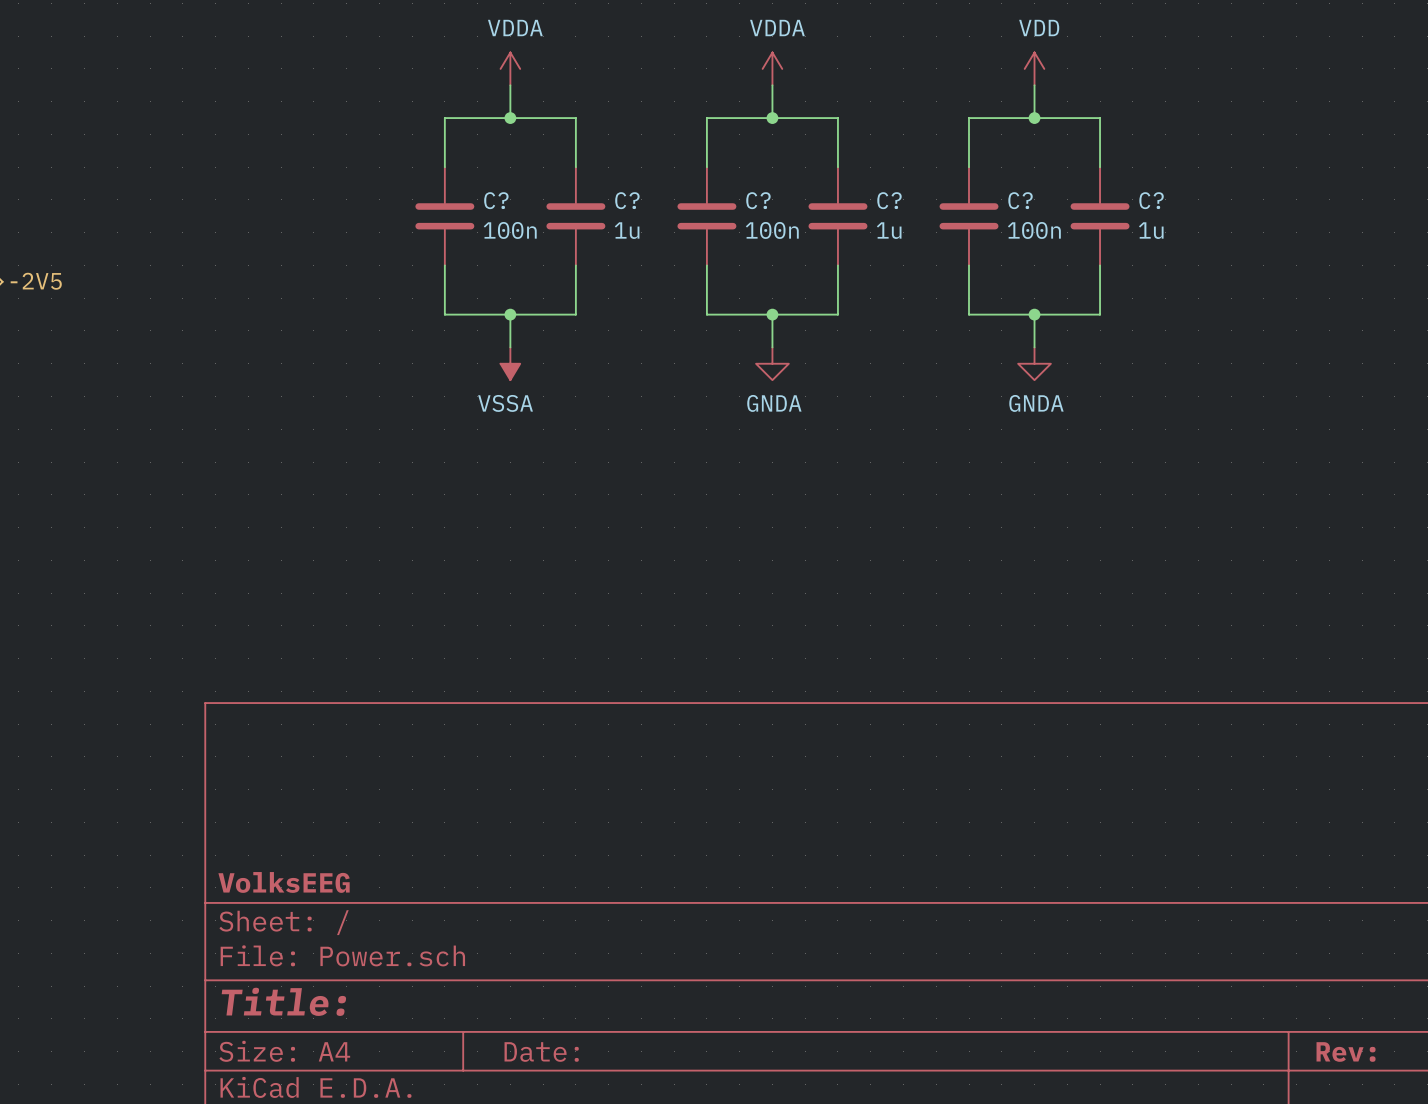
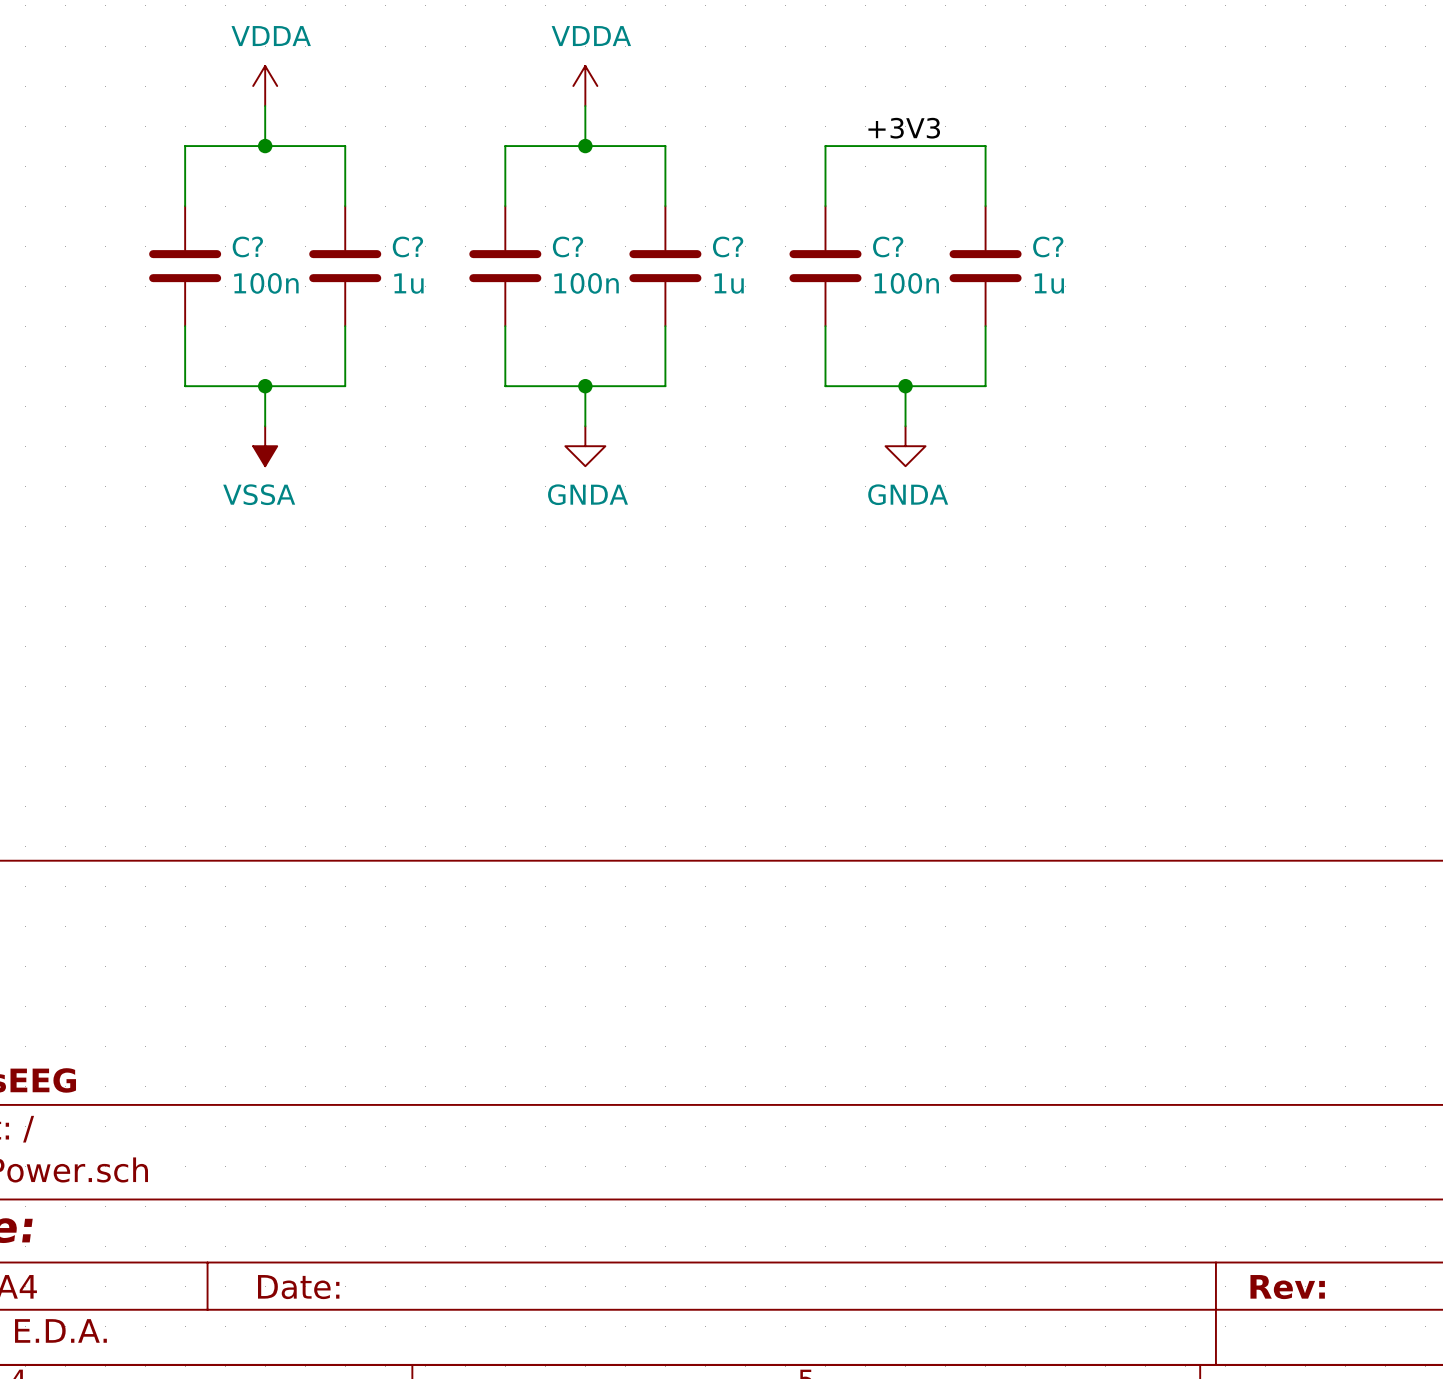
power symbol: VDD (1034, 68) -> none
wire: (1034, 85) (1034, 118) -> none
label: none -> +3V3 (904, 128)
junction: (1034, 118) -> none

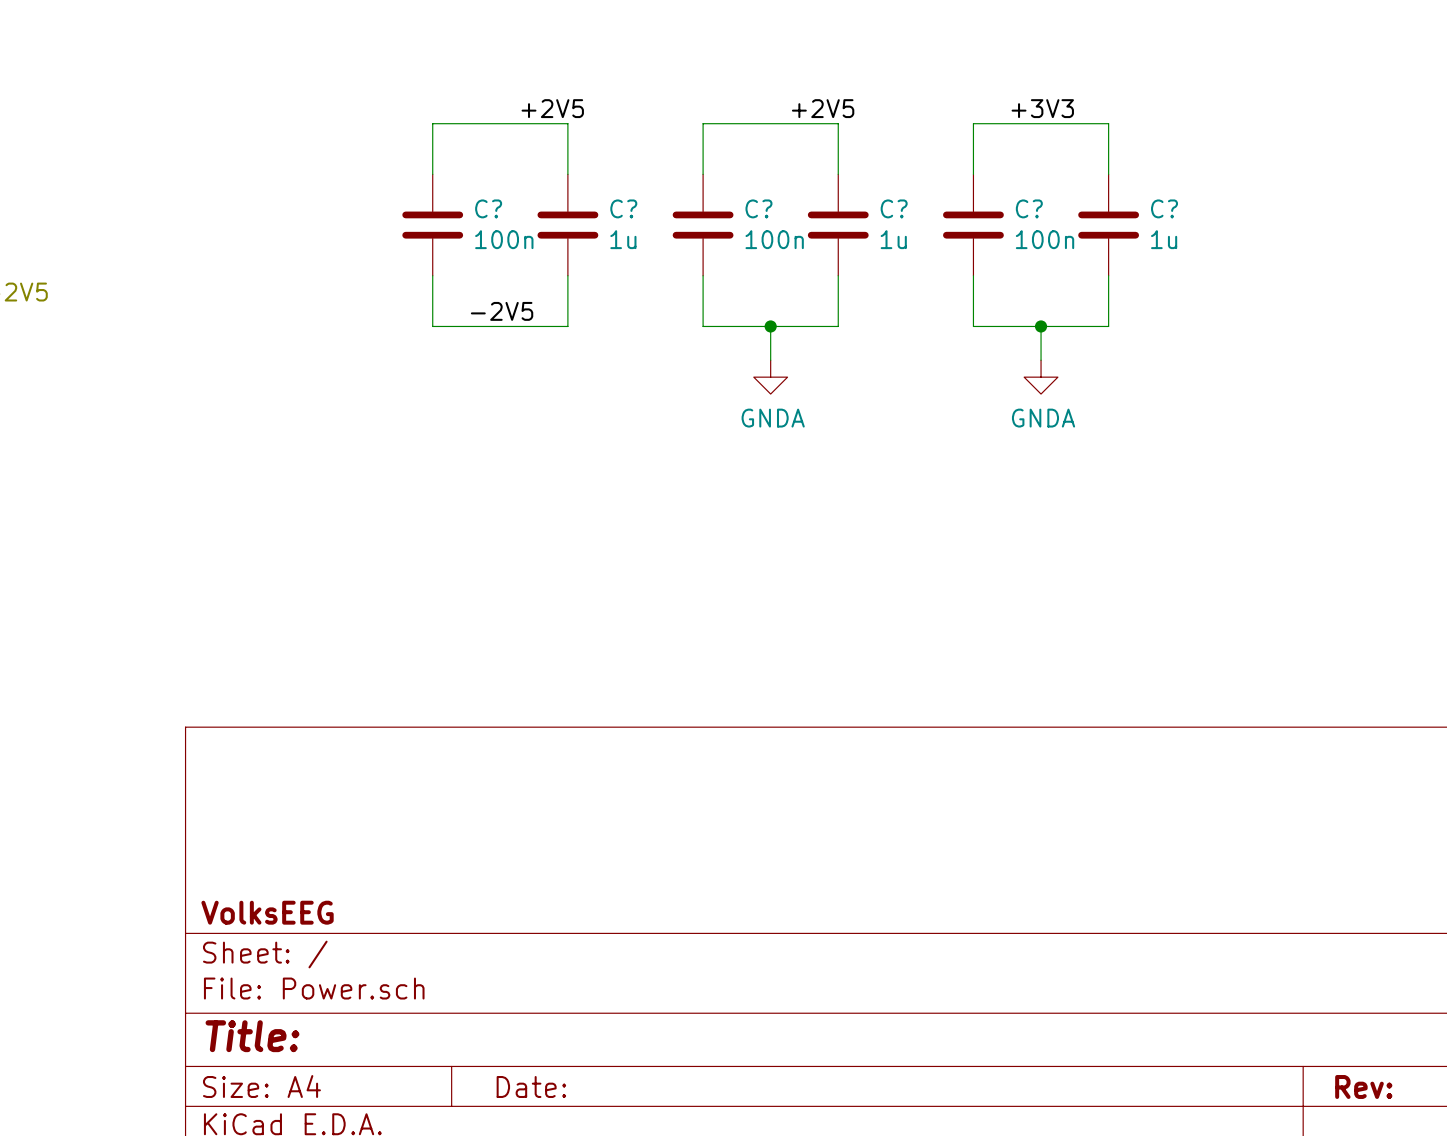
power symbol: VDDA (265, 86) -> none
power symbol: VDDA (585, 86) -> none
wire: (265, 106) (265, 146) -> none
wire: (585, 106) (585, 146) -> none
label: none -> +2V5 (552, 108)
label: none -> +2V5 (823, 108)
junction: (265, 146) -> none
junction: (585, 146) -> none
label: none -> -2V5 (502, 311)
wire: (265, 386) (265, 426) -> none
junction: (265, 386) -> none
power symbol: VSSA (265, 446) -> none

